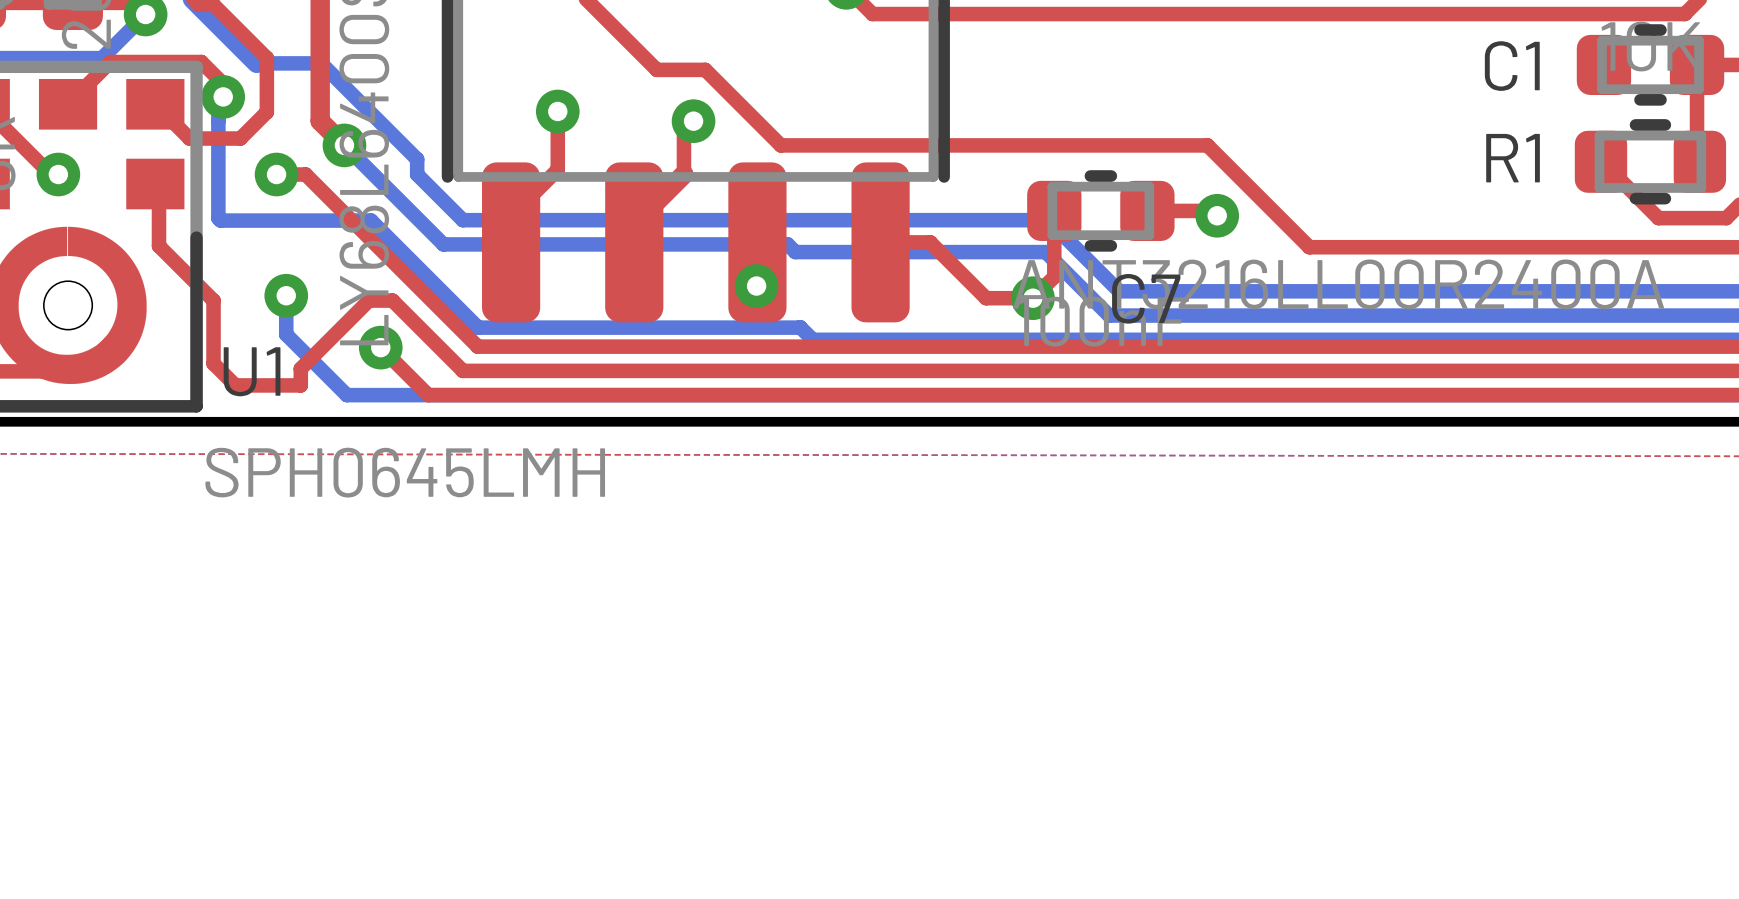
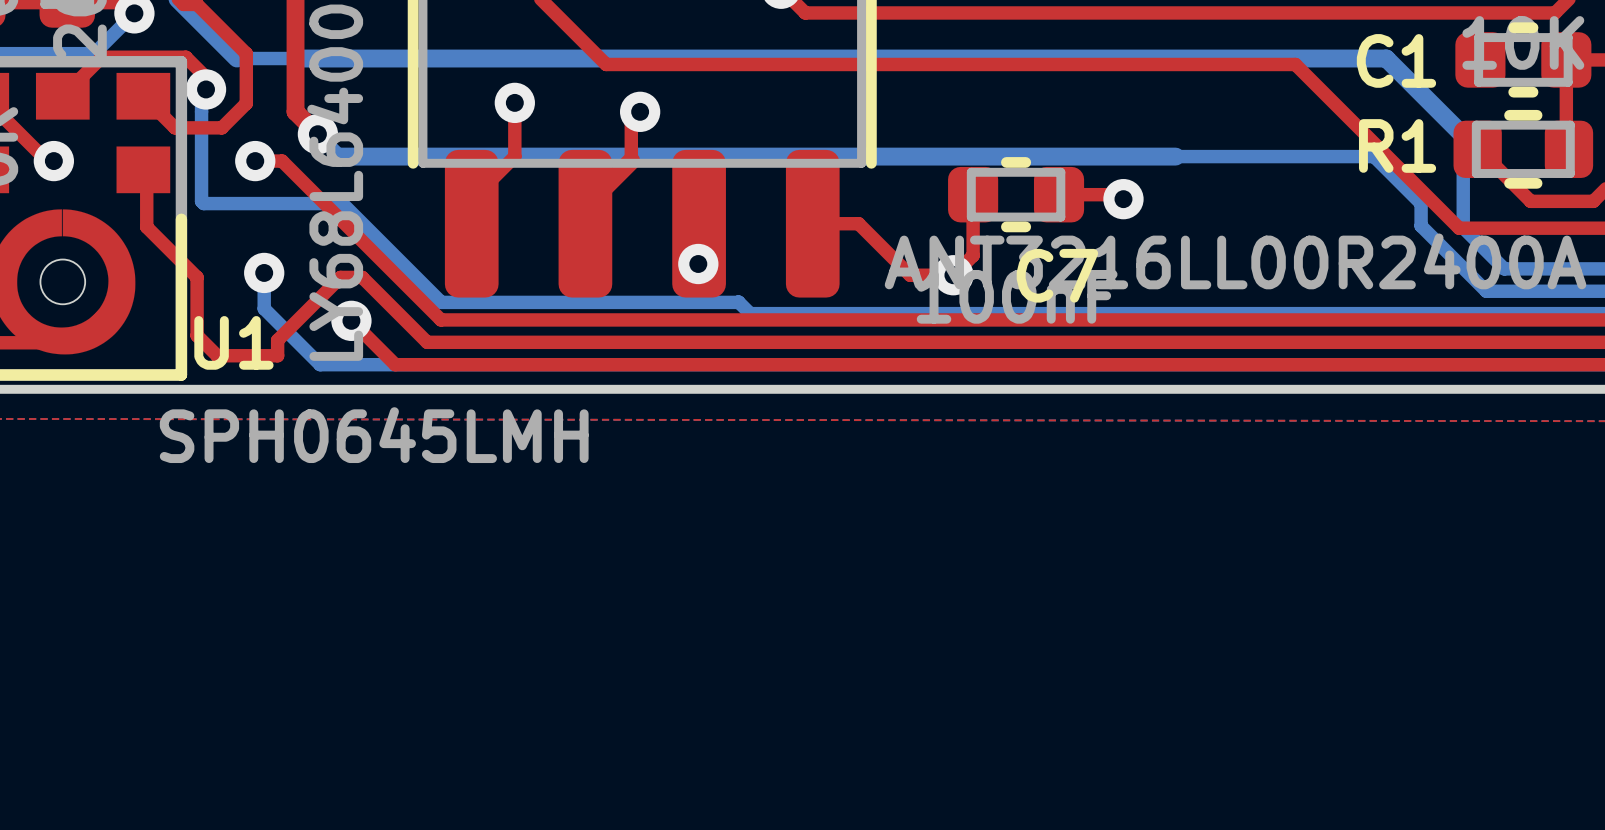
bottom track: (321, 63) (417, 159) (417, 174) (462, 220) (1035, 220) (1042, 227) (1055, 227) (1119, 291) (1629, 291) -> (296, 58) (1386, 58) (1463, 135) (1463, 227) (1504, 268)
top track: (705, 69) (780, 145) (1207, 145) (1309, 247) (1580, 247) -> (650, 64) (1295, 64) (1459, 228)
bottom track: (368, 169) (443, 244) (787, 244) (795, 252) (1045, 252) (1109, 315) (1610, 315) -> (340, 156) (1374, 156) (1421, 203) (1421, 225) (1486, 291)

